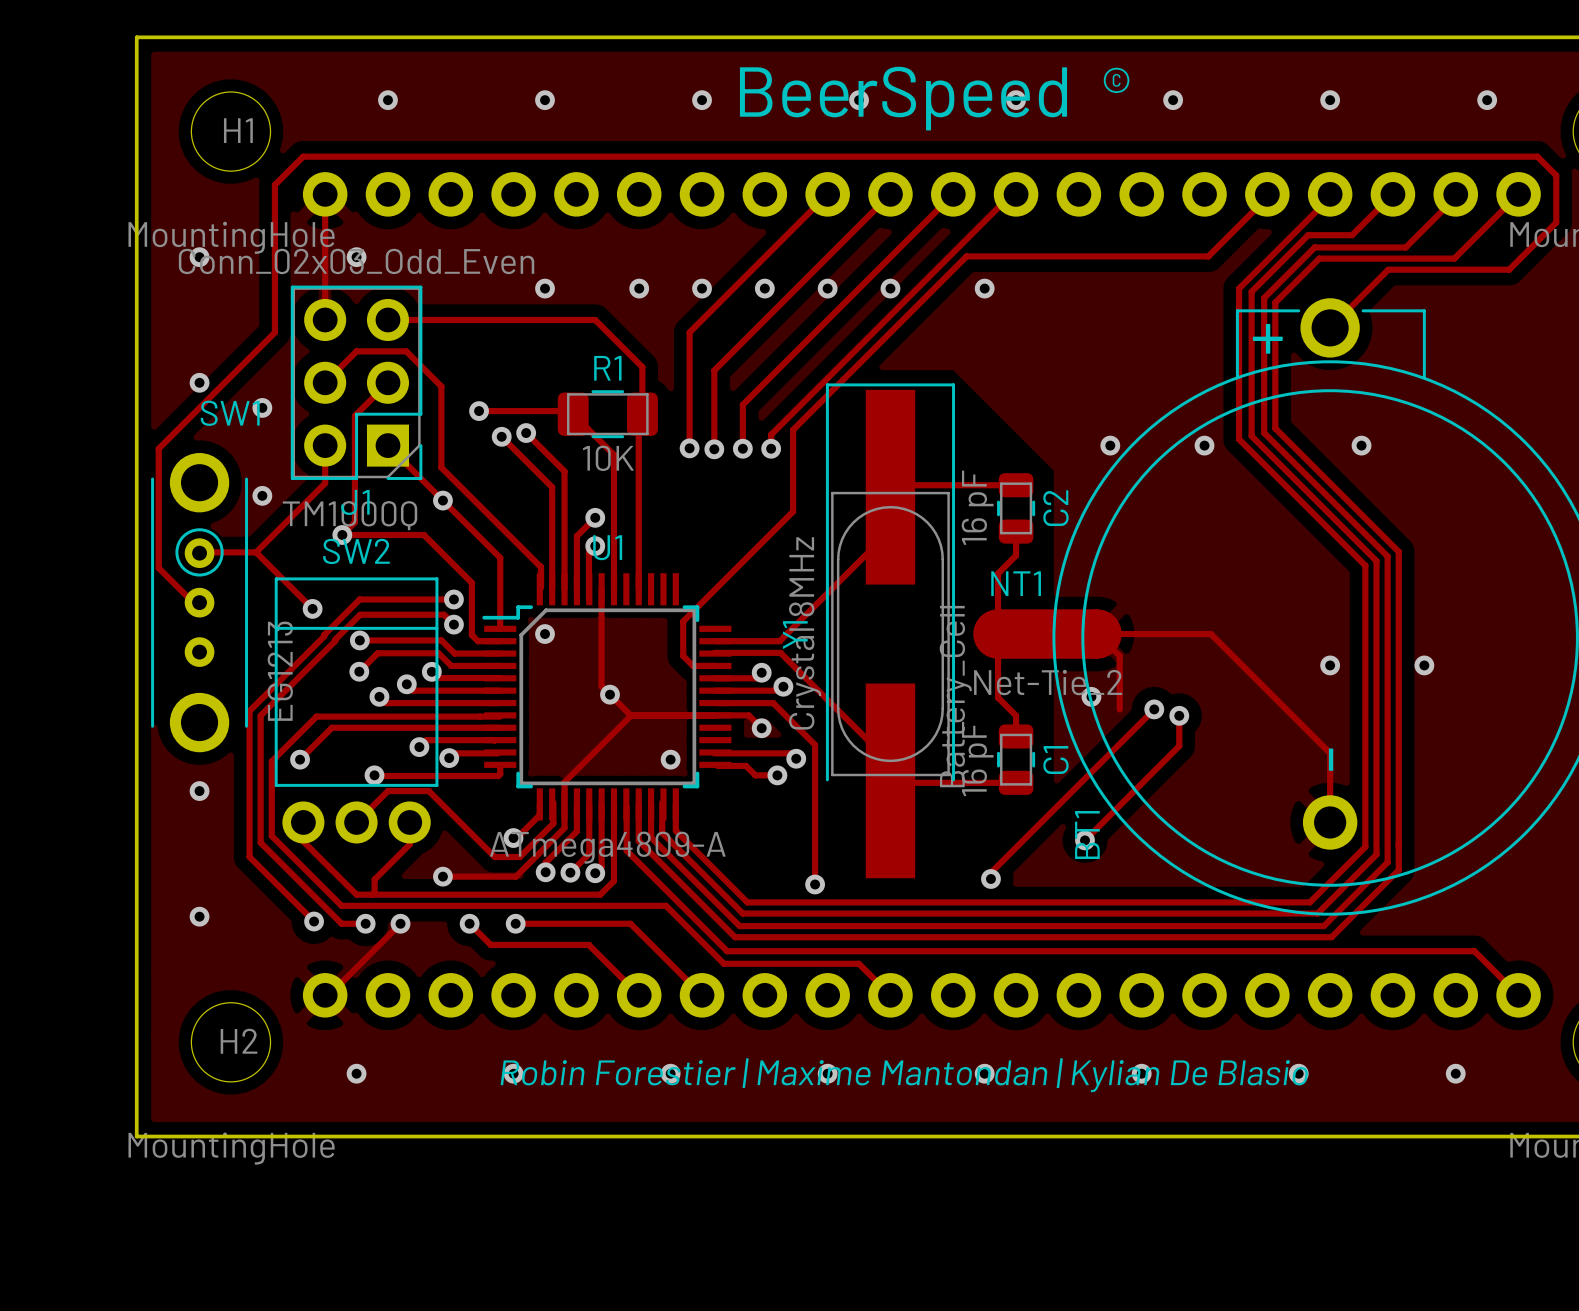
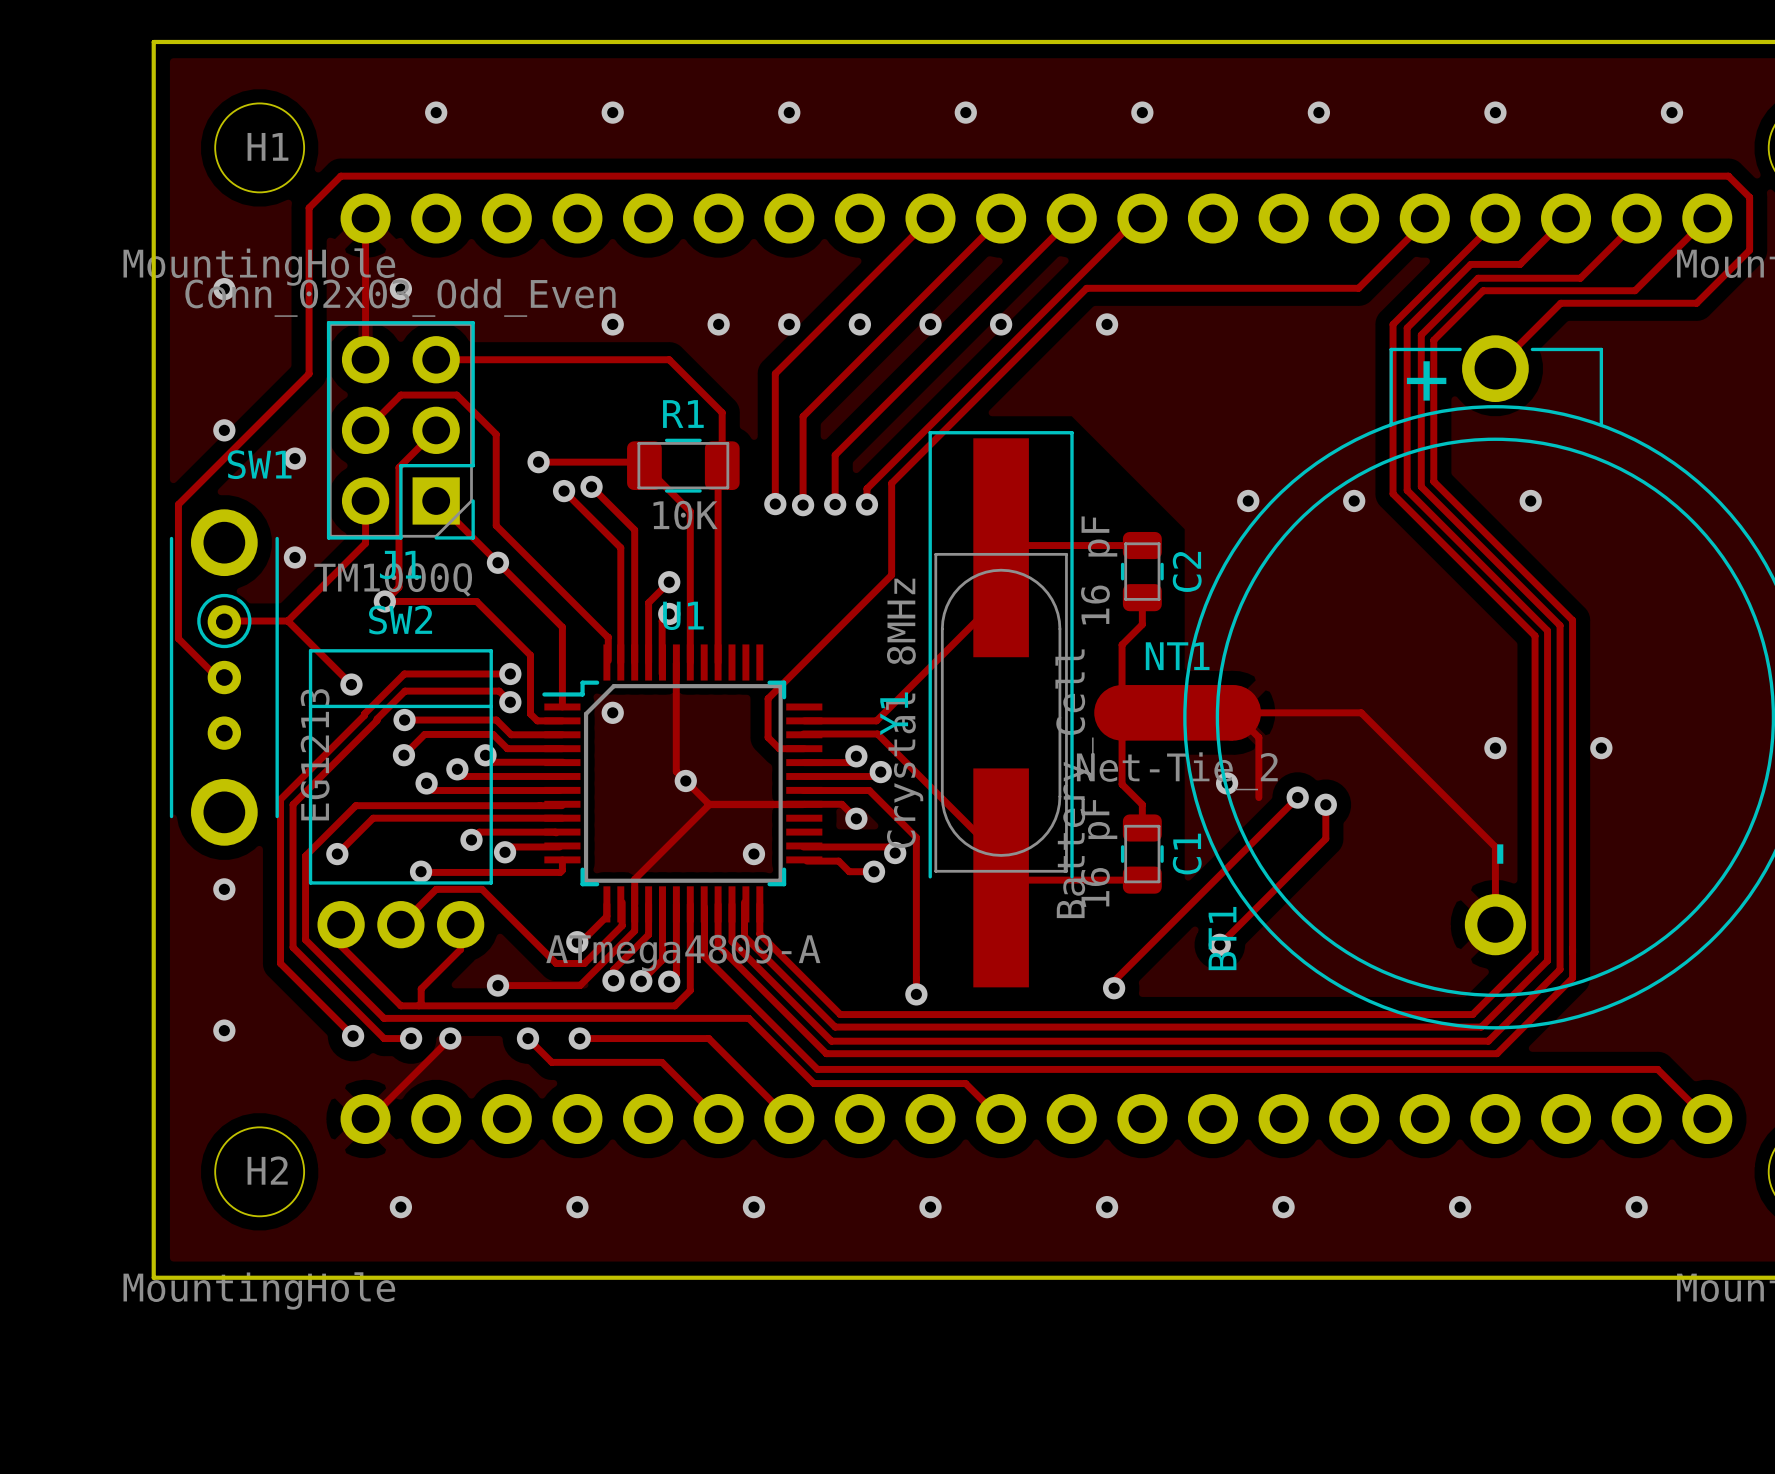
text: © (1116, 80) -> none
text: BeerSpeed (903, 98) -> none
NT1 name position: NT1 (1016, 583) -> NT1 (1177, 656)
text: Robin Forestier | Maxime Mantondan | Kylian De Blasio (904, 1075) -> none

